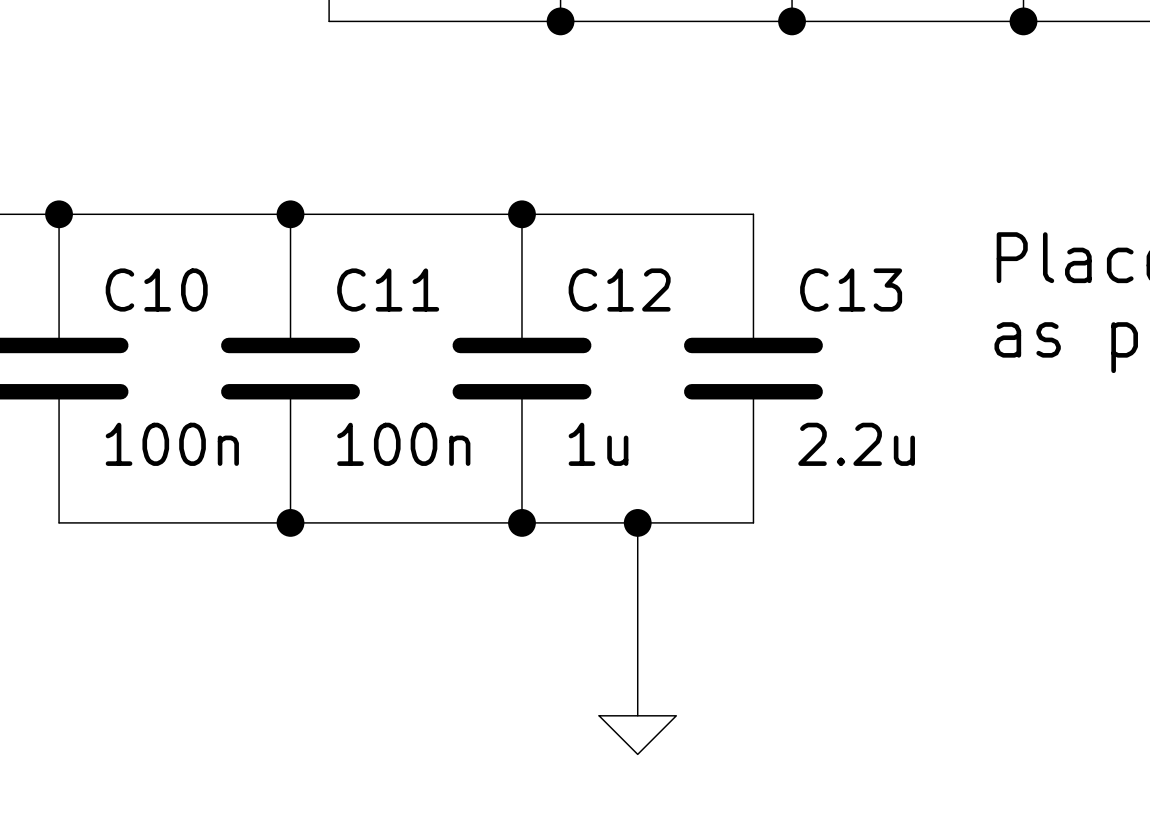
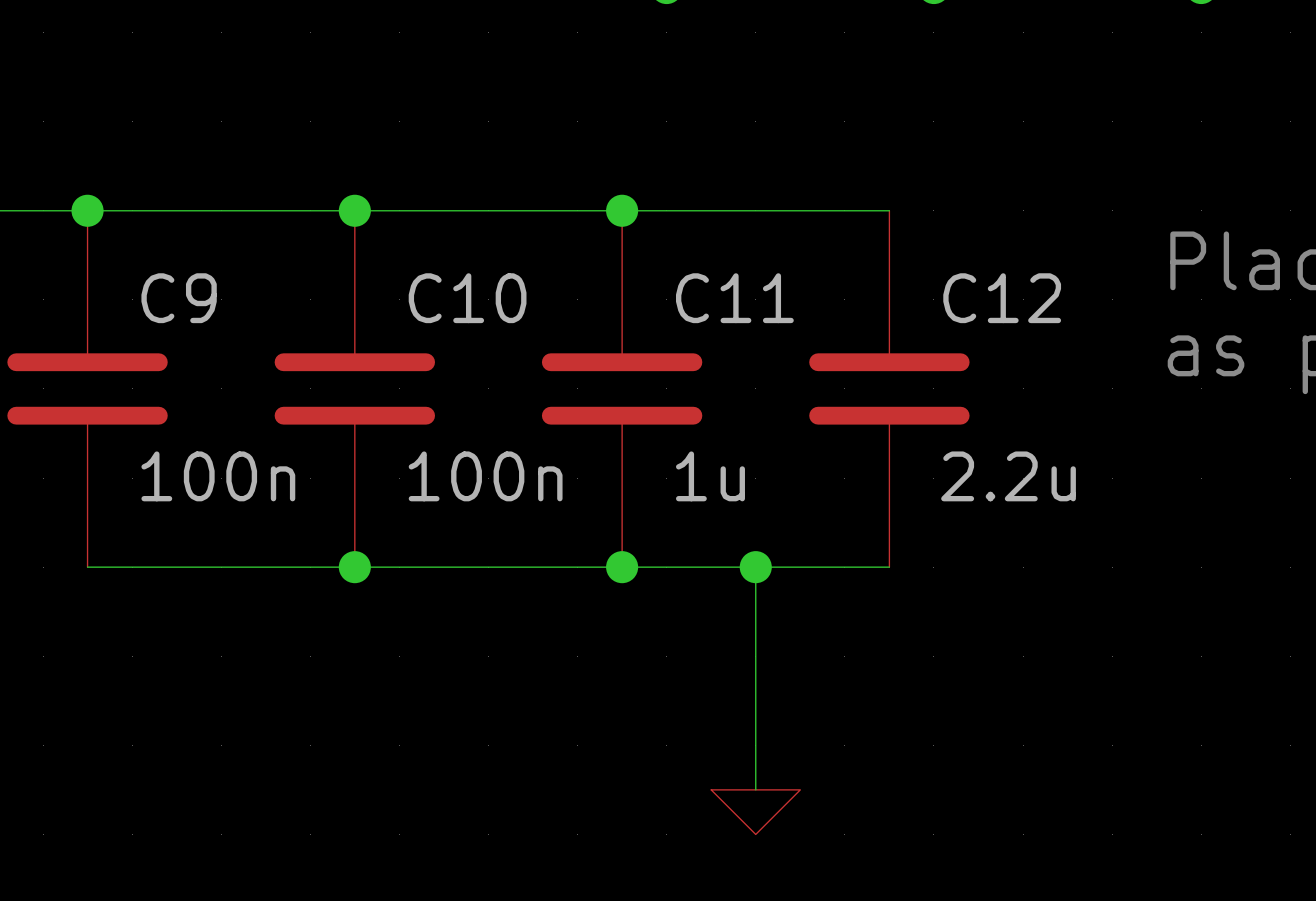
C10 name: C10 (156, 290) -> C9 (179, 298)
C11 name: C11 (388, 290) -> C10 (467, 298)
C12 name: C12 (619, 290) -> C11 (734, 298)
C13 name: C13 (851, 290) -> C12 (1002, 298)

